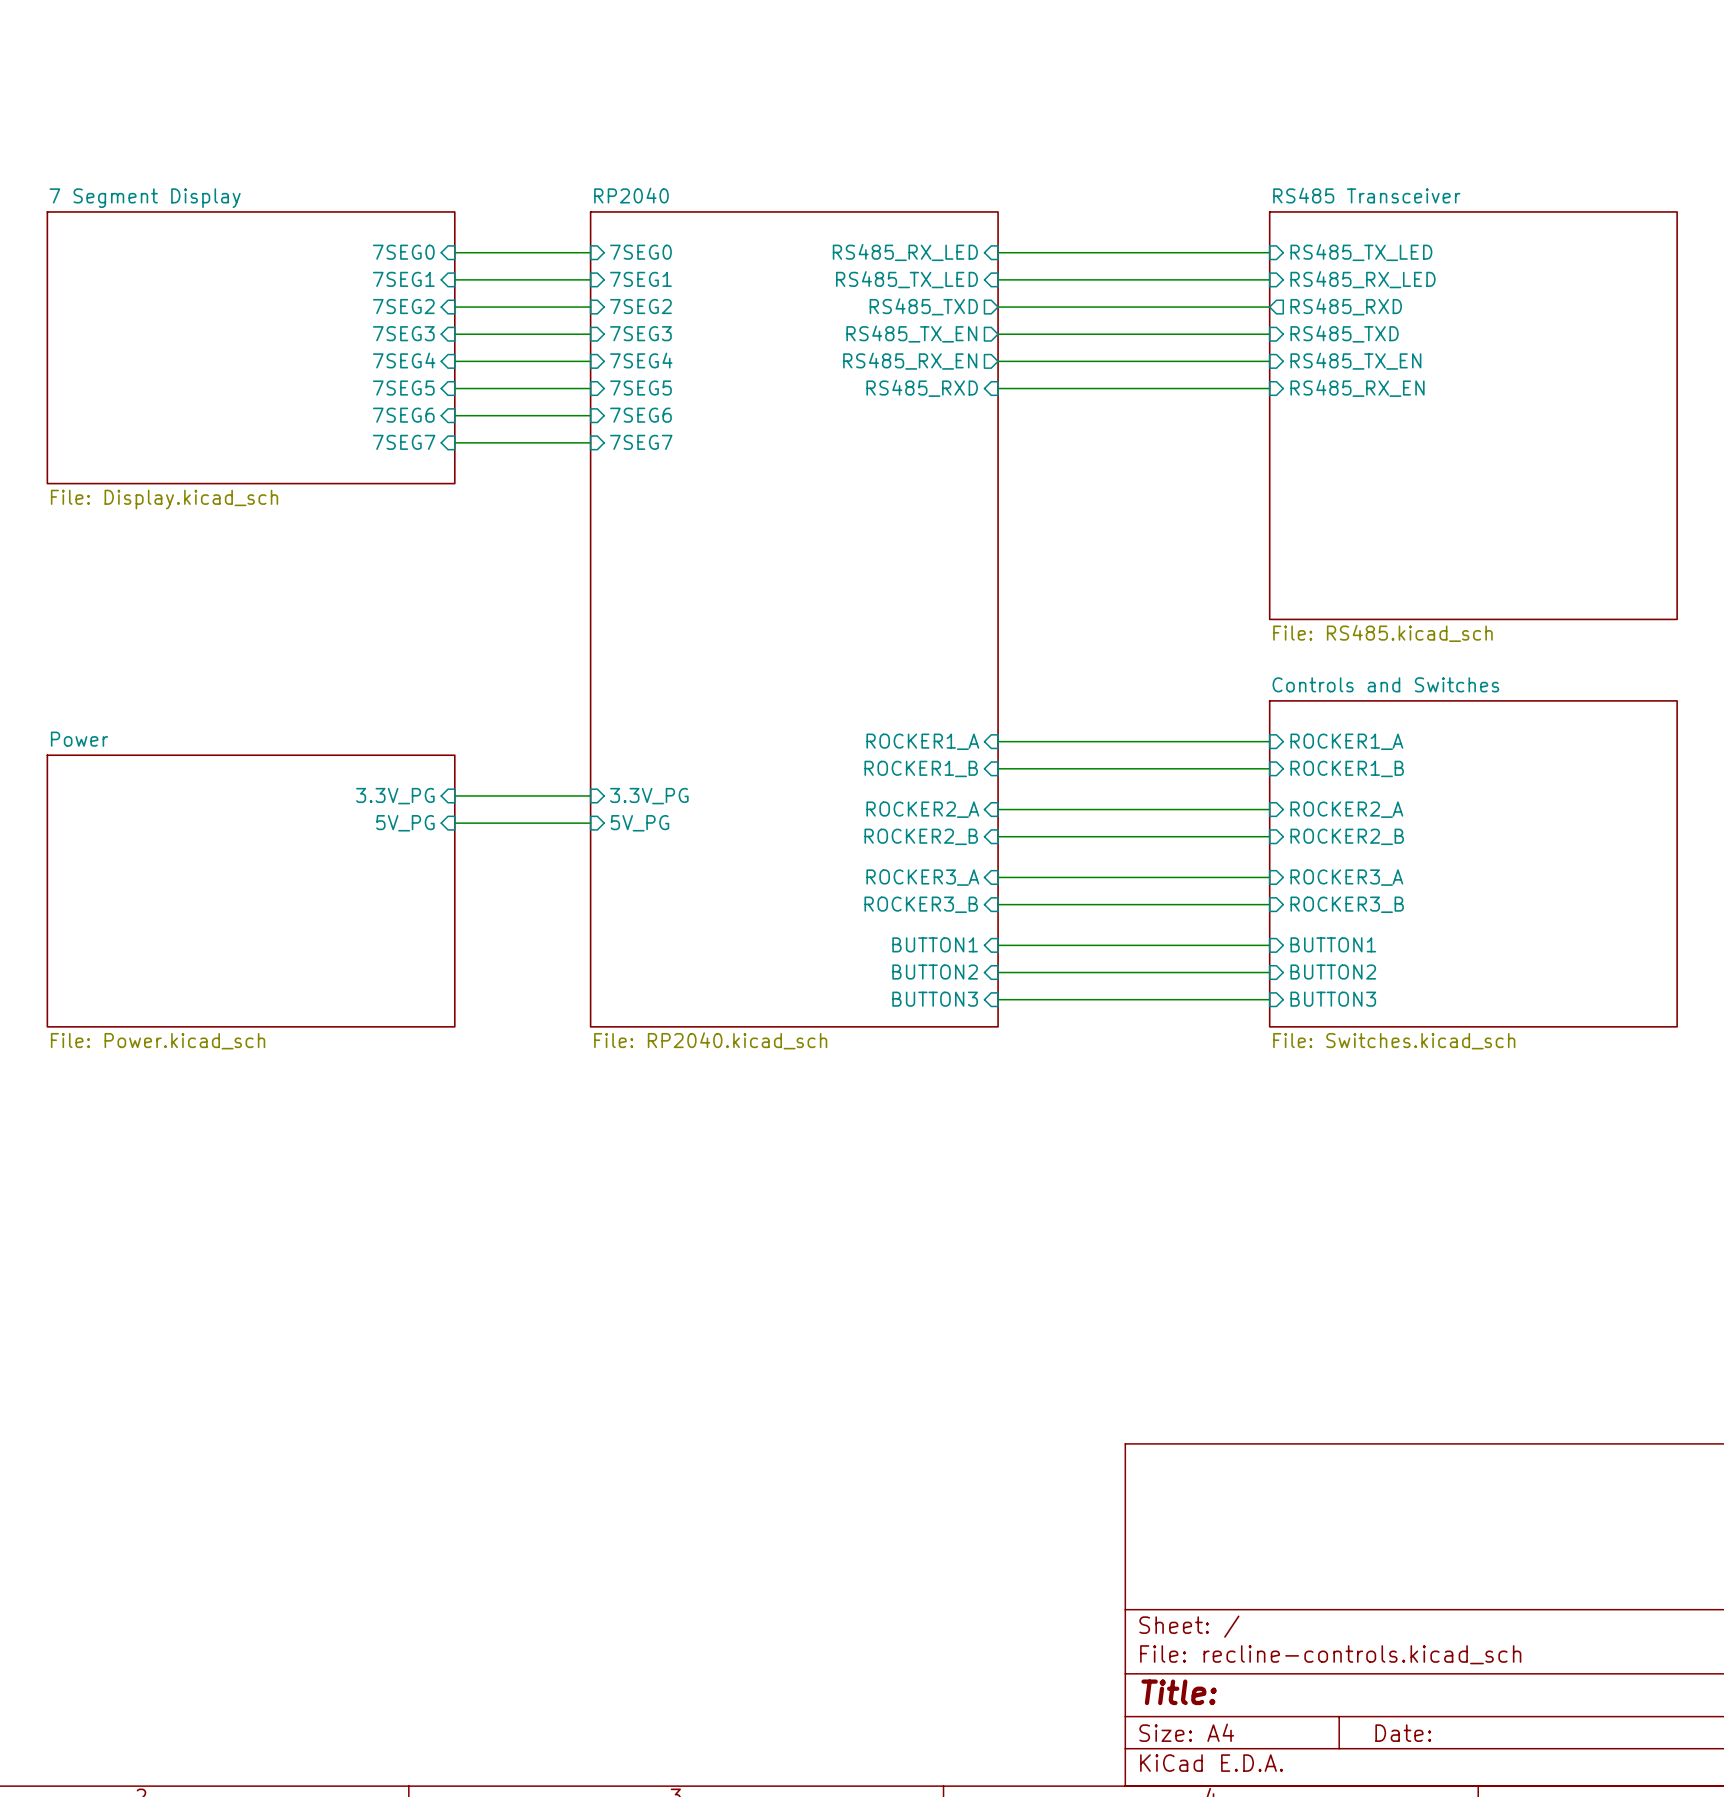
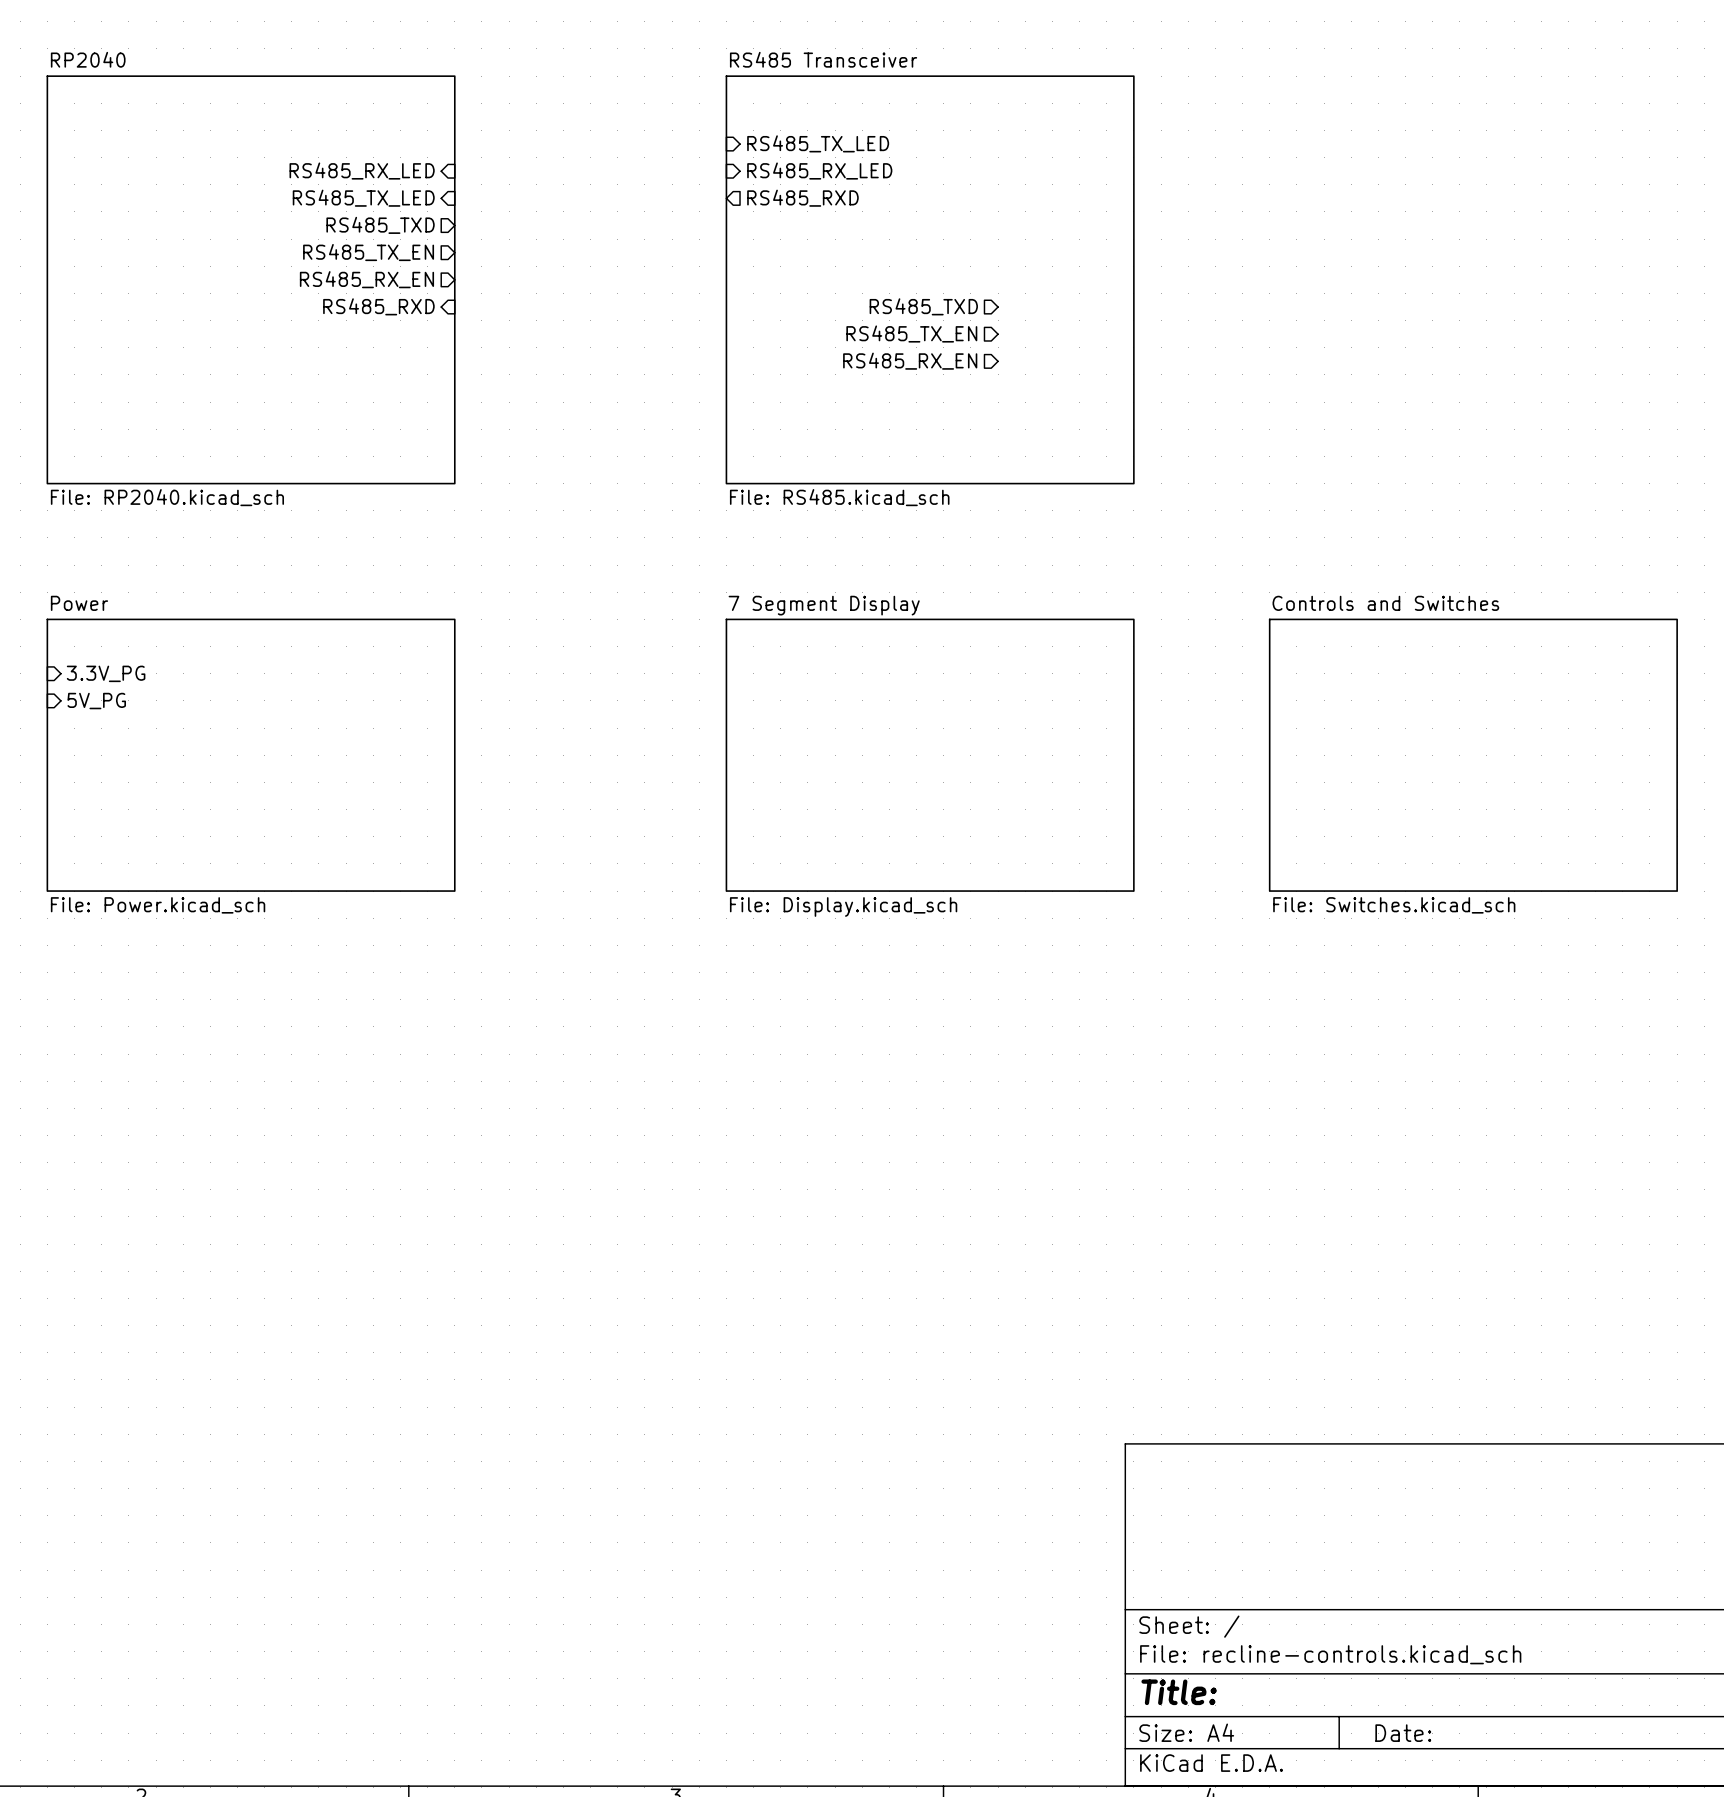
sheet pin: none -> RS485_TX_LED (818, 143)
sheet pin: none -> RS485_RX_LED (362, 171)
sheet RP2040 name position: RP2040 (631, 195) -> RP2040 (88, 59)
sheet pin: none -> RS485_TX_LED (363, 198)
sheet pin: none -> RS485_RXD (802, 198)
sheet RP2040 shape: [589, 211, 999, 1028] -> [46, 75, 456, 485]
sheet pin: none -> RS485_TXD (380, 225)
sheet pin shape: input (403, 252) -> output (368, 252)
sheet pin: 7SEG0 (403, 252) -> RS485_TX_EN (368, 252)
wire: (454, 252) (590, 252) -> none
sheet pin: 7SEG0 (640, 252) -> none
sheet pin rotation: 0° (905, 252) -> 180° (819, 171)
wire: (998, 252) (1269, 252) -> none
sheet pin: RS485_TX_LED (1361, 252) -> none
sheet pin shape: input (403, 279) -> output (366, 279)
sheet pin: 7SEG1 (403, 279) -> RS485_RX_EN (366, 279)
wire: (454, 279) (590, 279) -> none
sheet pin: 7SEG1 (640, 279) -> none
sheet pin: RS485_TX_LED (906, 279) -> none
wire: (998, 279) (1269, 279) -> none
sheet pin: RS485_RX_LED (1363, 279) -> none
sheet pin: 7SEG2 (403, 306) -> RS485_RXD (378, 306)
sheet pin: 7SEG2 (640, 306) -> none
sheet pin: RS485_RXD (1346, 306) -> none
wire: (454, 307) (590, 307) -> none
wire: (998, 307) (1269, 307) -> none
sheet pin: 7SEG3 (403, 333) -> none
sheet pin: 7SEG3 (640, 333) -> none
wire: (454, 334) (590, 334) -> none
wire: (998, 334) (1269, 334) -> none
sheet pin: RS485_TXD (1344, 334) -> none
sheet 7 Segment Display position: (251, 347) -> (930, 755)
sheet pin: 7SEG4 (404, 360) -> none
sheet pin: 7SEG4 (641, 360) -> none
wire: (454, 361) (590, 361) -> none
wire: (998, 361) (1269, 361) -> none
sheet pin: RS485_TX_EN (1355, 361) -> none
sheet pin: 7SEG5 (403, 388) -> none
wire: (454, 388) (590, 388) -> none
sheet pin: 7SEG5 (640, 388) -> none
sheet pin: RS485_RXD (922, 388) -> none
wire: (998, 388) (1269, 388) -> none
sheet pin: RS485_RX_EN (1357, 388) -> none
sheet pin: 7SEG6 (403, 415) -> none
wire: (454, 415) (590, 415) -> none
sheet pin: 7SEG6 (640, 415) -> none
sheet RS485 Transceiver position: (1473, 415) -> (930, 279)
sheet pin: 7SEG7 (404, 442) -> none
wire: (454, 442) (590, 442) -> none
sheet pin: 7SEG7 (641, 442) -> none
sheet pin: none -> 3.3V_PG (106, 673)
sheet pin: none -> 5V_PG (96, 701)
sheet pin: ROCKER1_A (922, 741) -> none
wire: (998, 741) (1269, 741) -> none
sheet pin: ROCKER1_A (1346, 741) -> none
sheet Controls and Switches: none -> File: Switches.kicad_sch (1473, 755)
sheet pin: ROCKER1_B (921, 768) -> none
wire: (998, 768) (1269, 768) -> none
sheet pin: ROCKER1_B (1347, 768) -> none
wire: (454, 795) (590, 795) -> none
sheet pin: 3.3V_PG (395, 796) -> none
sheet pin: 3.3V_PG (649, 796) -> none
sheet pin: ROCKER2_A (922, 809) -> none
wire: (998, 809) (1269, 809) -> none
sheet pin: ROCKER2_A (1346, 809) -> none
sheet pin: 5V_PG (405, 823) -> none
wire: (454, 823) (590, 823) -> none
sheet pin: 5V_PG (639, 823) -> none
sheet pin: ROCKER2_B (921, 836) -> none
wire: (998, 836) (1269, 836) -> none
sheet pin: ROCKER2_B (1347, 836) -> none
sheet Controls and Switches: File: Switches.kicad_sch (1473, 863) -> none
sheet pin: ROCKER3_A (922, 877) -> none
wire: (998, 877) (1269, 877) -> none
sheet pin: ROCKER3_A (1346, 877) -> none
sheet Power position: (251, 891) -> (251, 755)
sheet pin: ROCKER3_B (921, 904) -> none
wire: (998, 904) (1269, 904) -> none
sheet pin: ROCKER3_B (1347, 904) -> none
sheet pin: BUTTON1 (935, 944) -> none
sheet pin: BUTTON1 (1333, 944) -> none
wire: (998, 945) (1269, 945) -> none
sheet pin: BUTTON2 (935, 972) -> none
wire: (998, 972) (1269, 972) -> none
sheet pin: BUTTON2 (1333, 972) -> none
sheet pin: BUTTON3 (935, 999) -> none
wire: (998, 999) (1269, 999) -> none
sheet pin: BUTTON3 (1333, 999) -> none
sheet RP2040 value position: File: RP2040.kicad_sch (710, 1040) -> File: RP2040.kicad_sch (167, 497)

